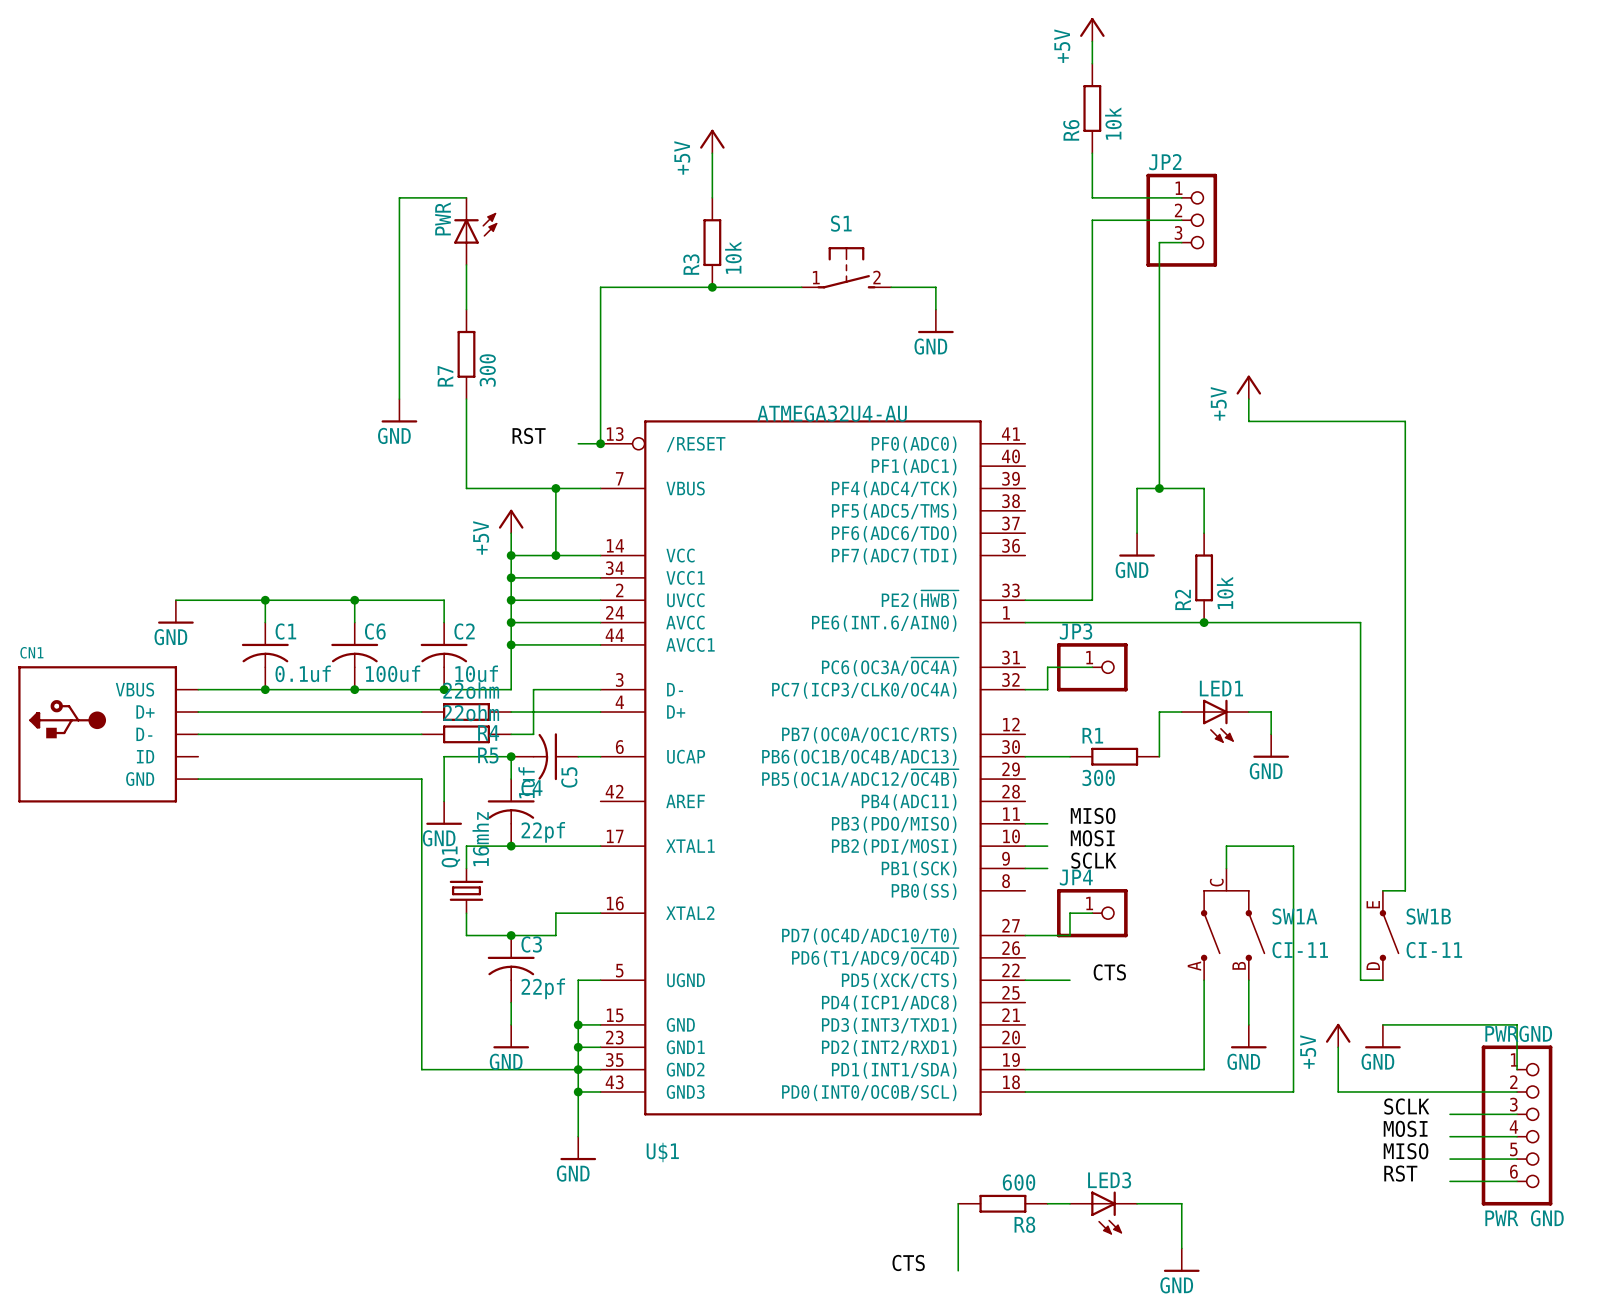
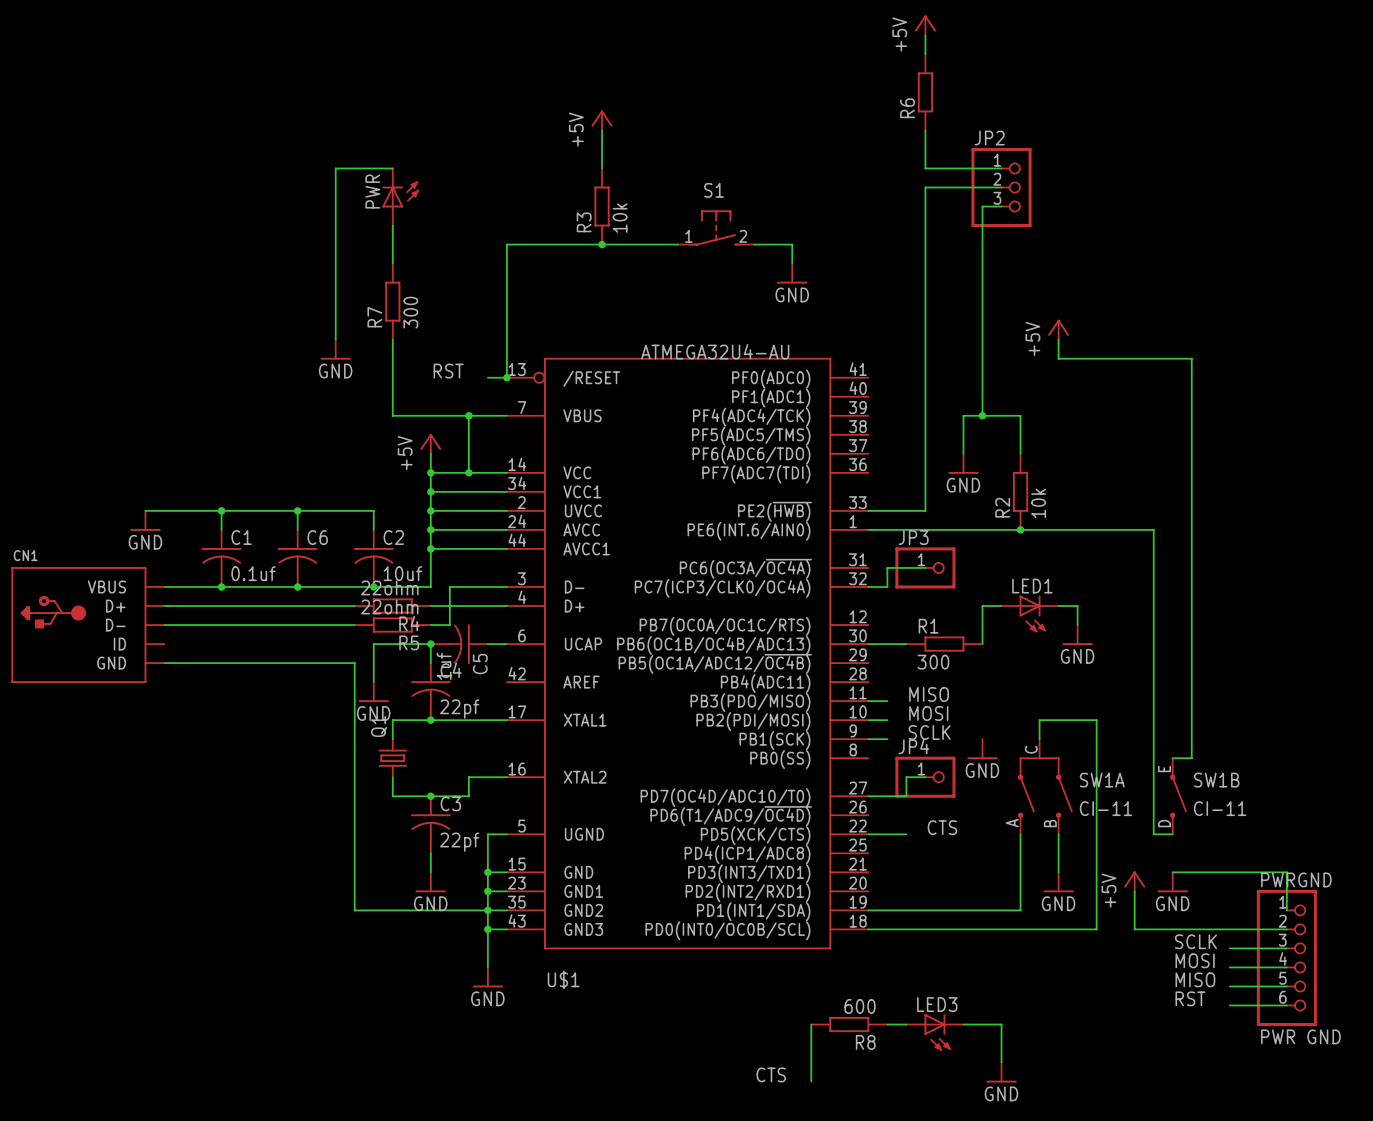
R6 value: 10k (1113, 123) -> none
C6 value: 100uf (393, 673) -> none
Q1 value: 16mhz (480, 839) -> none
power symbol: none -> GND (982, 749)

